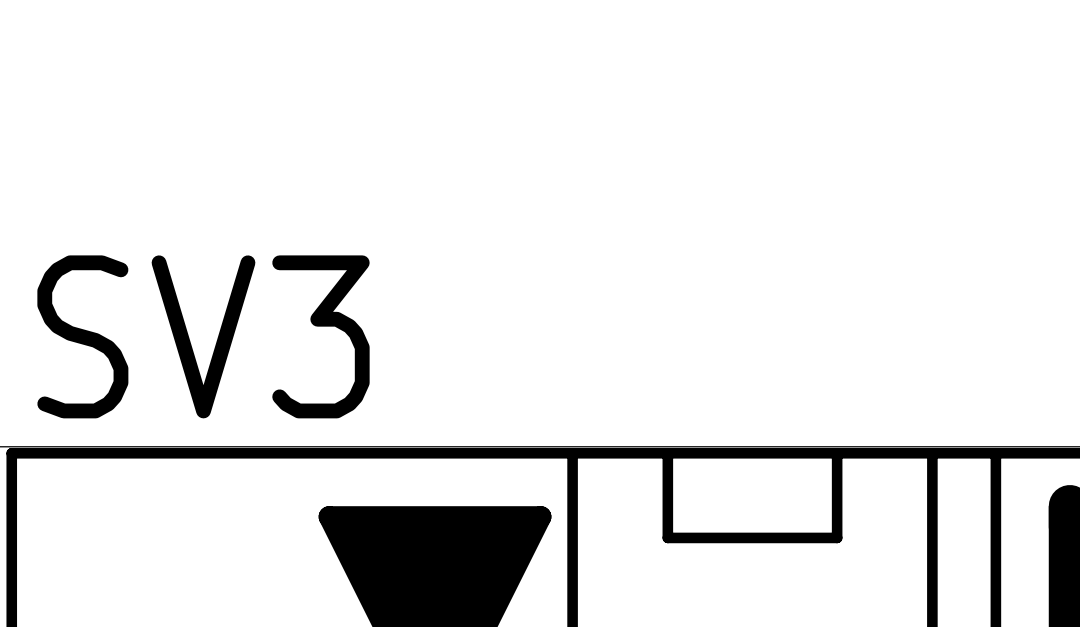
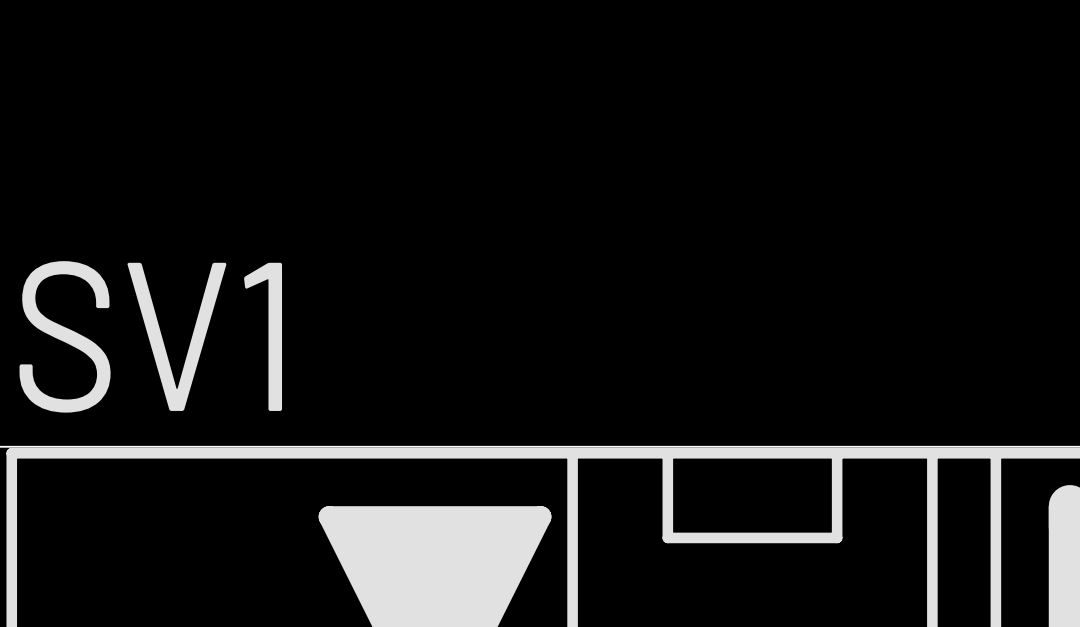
SV3 name: SV3 (203, 336) -> SV1 (150, 336)

